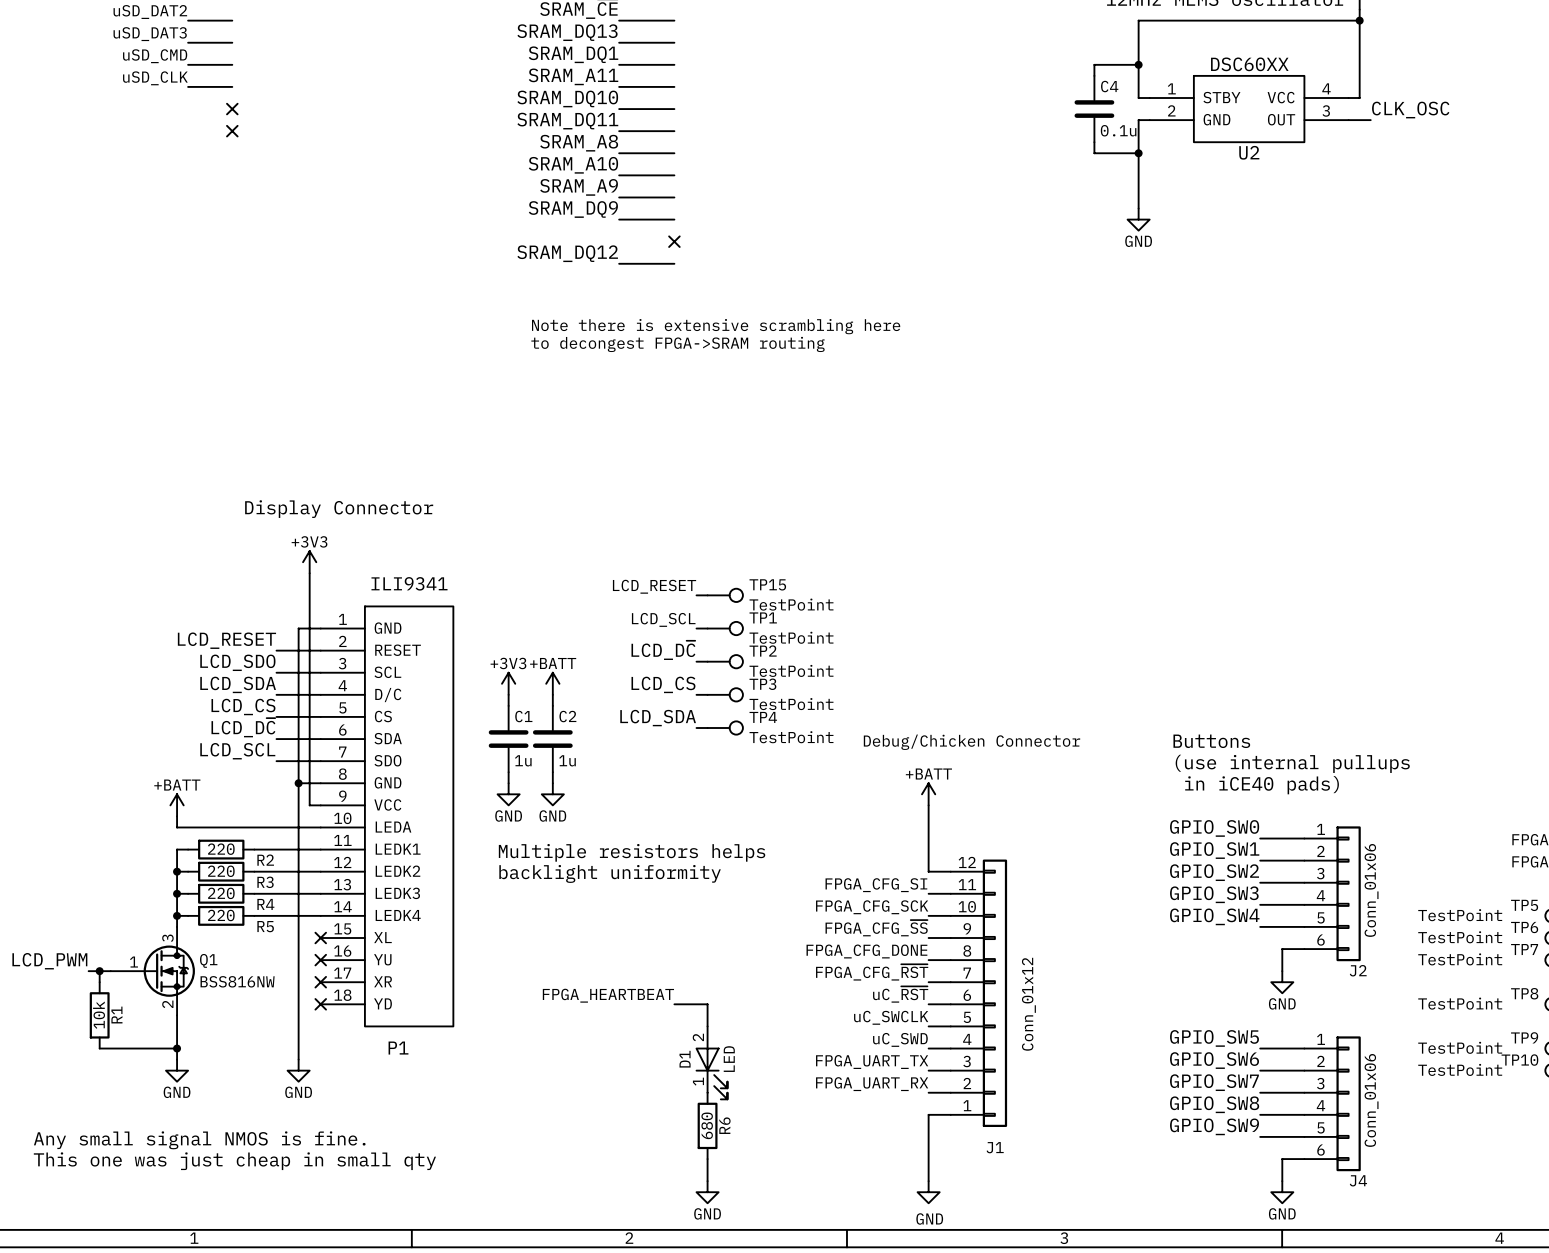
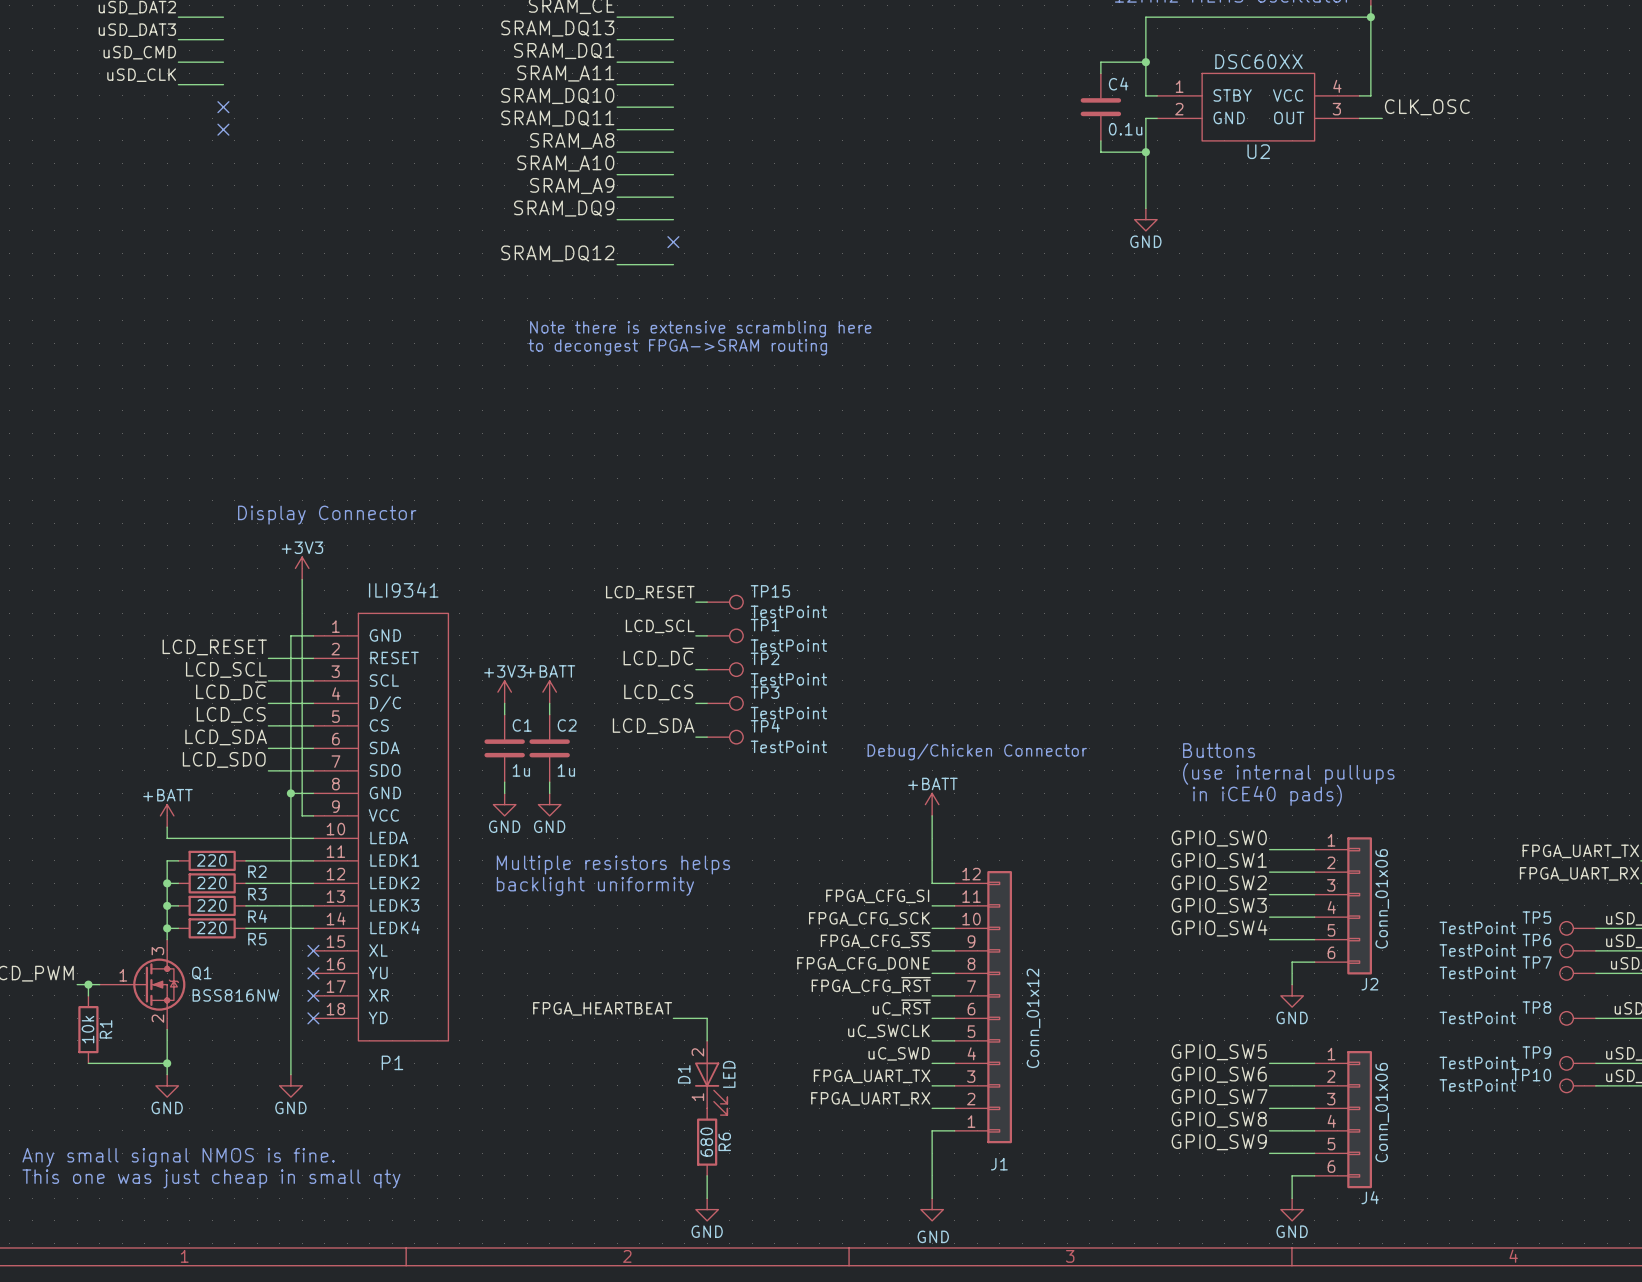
label: LCD_SDO (237, 662) -> LCD_SCL (226, 669)
label: LCD_SDA (238, 684) -> LCD_D~{C} (231, 690)
label: LCD_D~{C} (243, 727) -> LCD_SDA (226, 737)
label: LCD_SCL (237, 751) -> LCD_SDO (224, 759)

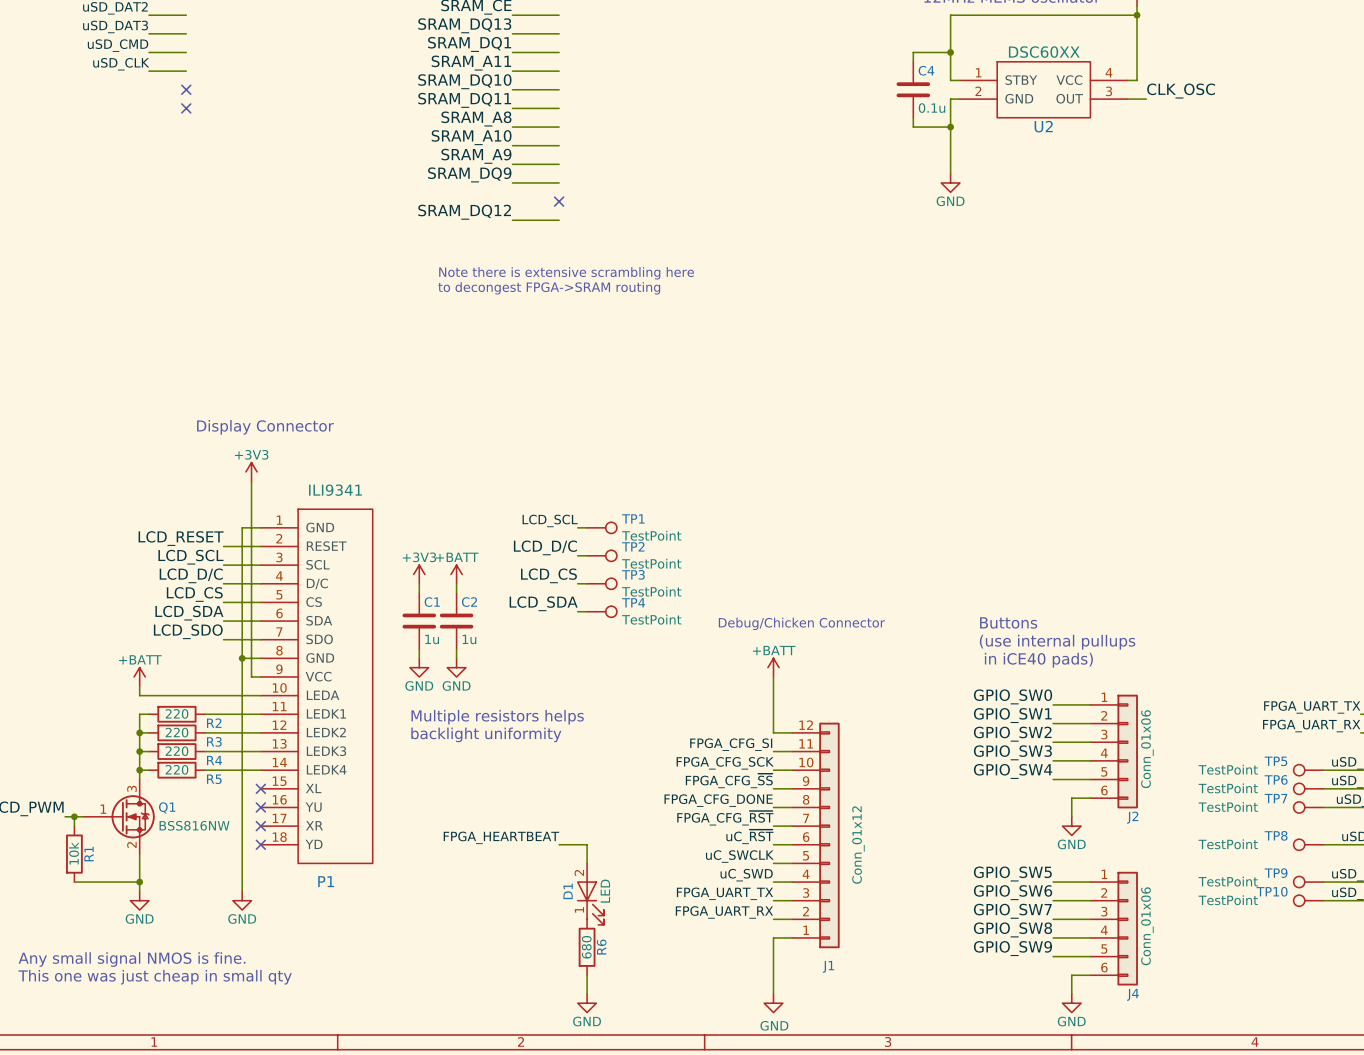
label: LCD_RESET (650, 592) -> none
wire: (695, 602) (707, 602) -> none
TP15: TestPoint (725, 602) -> none
label: LCD_D~{C} (658, 657) -> LCD_D/C (545, 547)
label: LCD_D~{C} (231, 690) -> LCD_D/C (191, 575)

